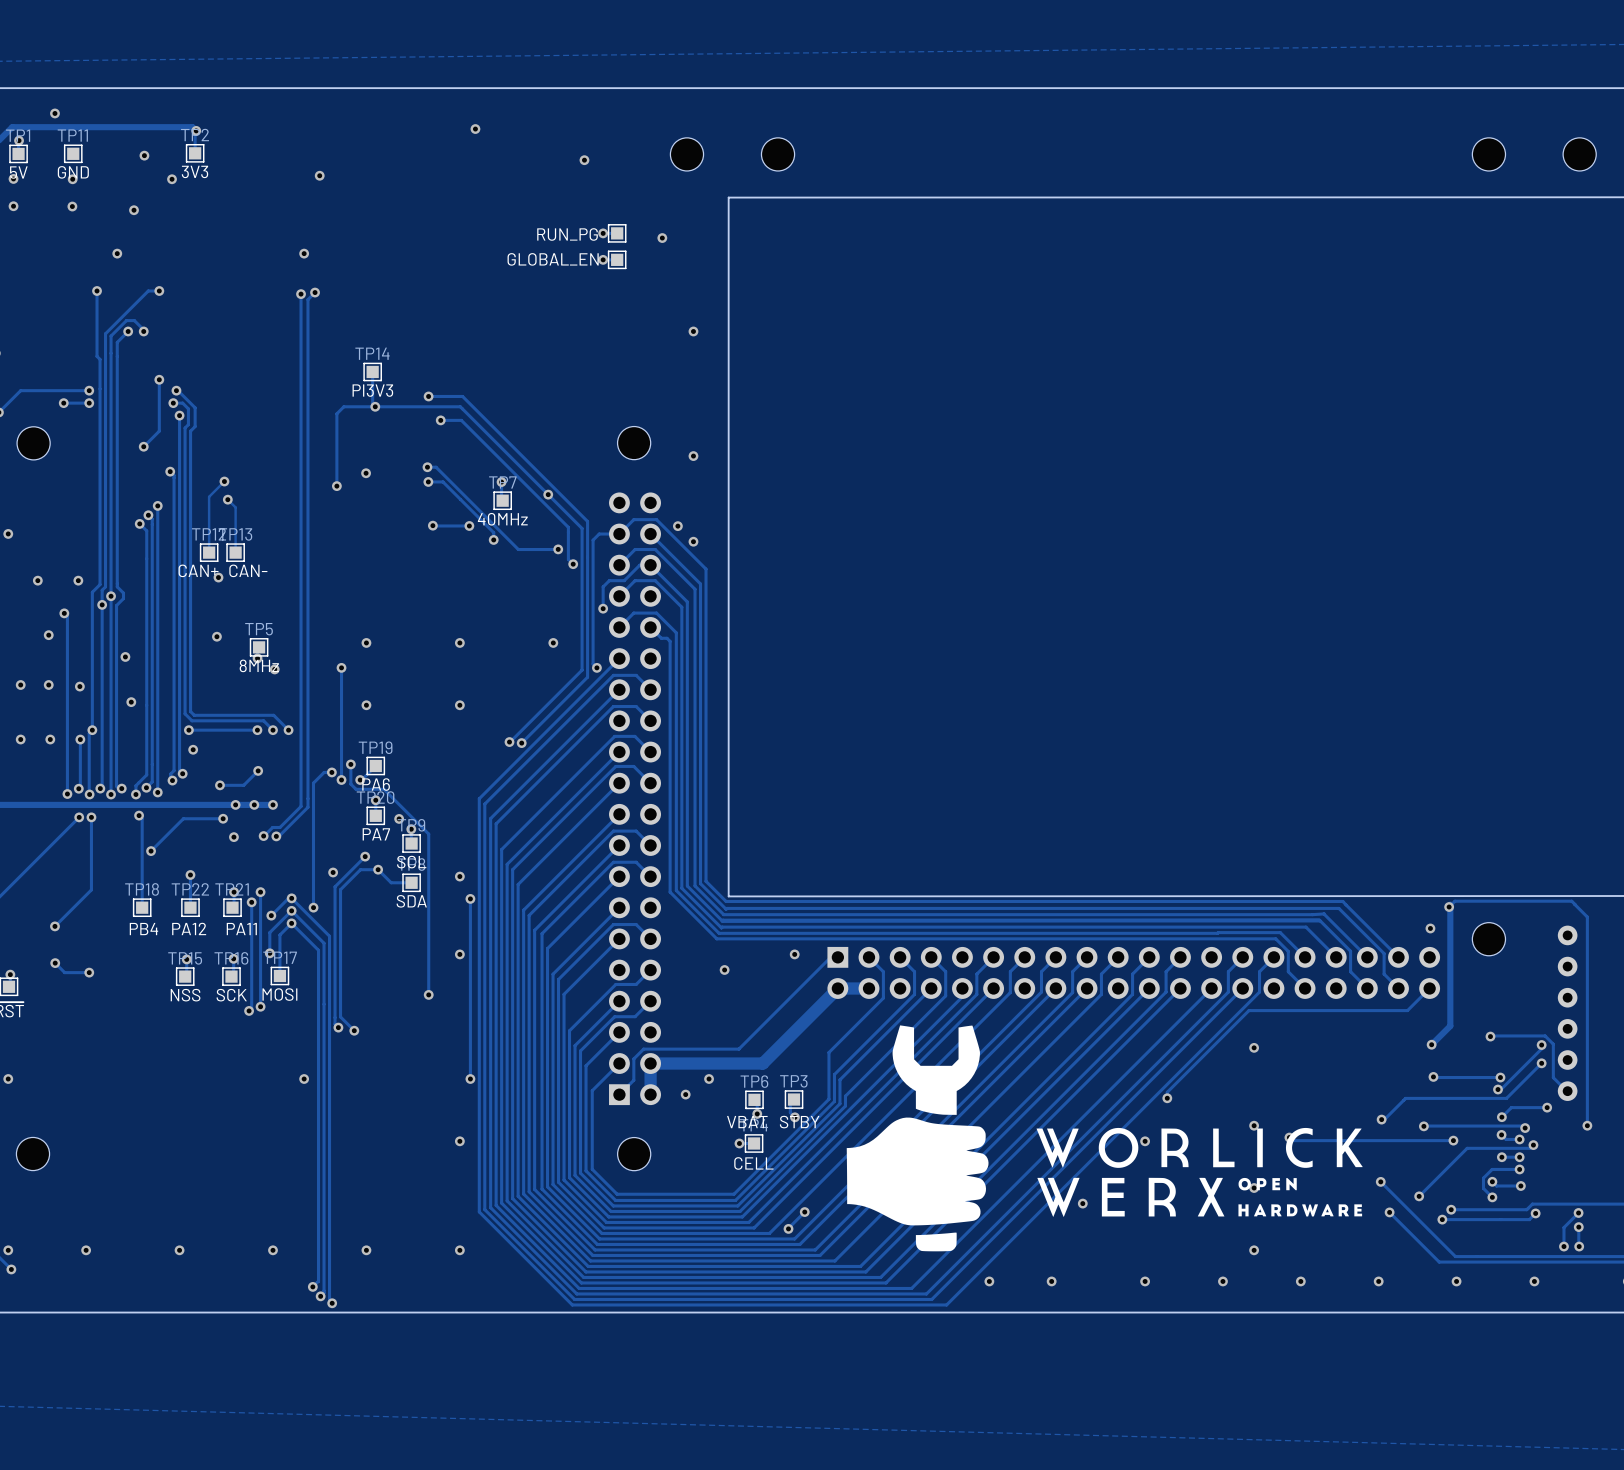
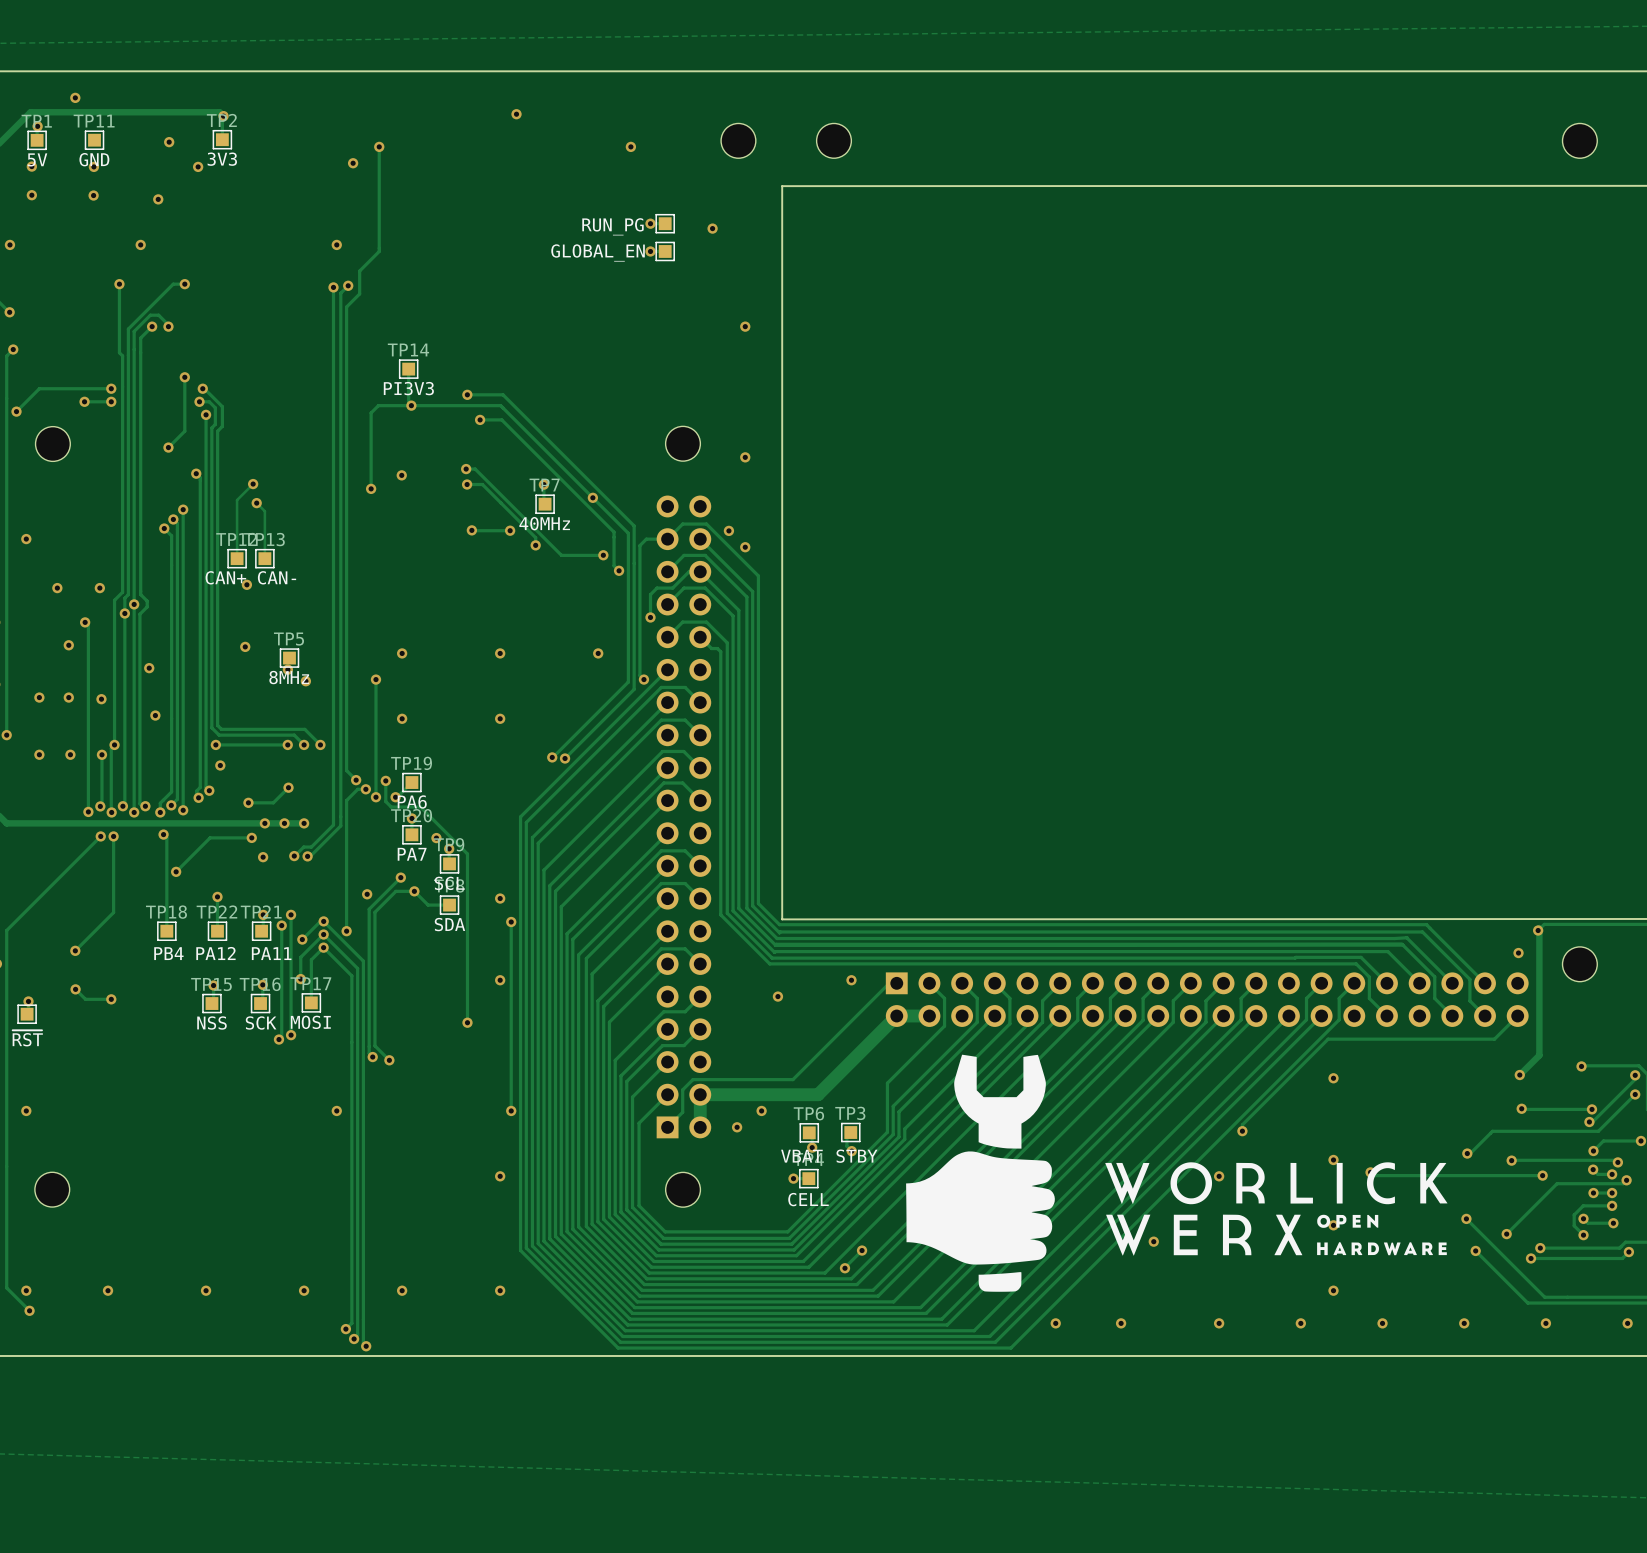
track: none -> (379, 146) (379, 251) (359, 271) (359, 293) (346, 307) (346, 770) (356, 780)
via: none -> (379, 146)
via: none -> (356, 780)

